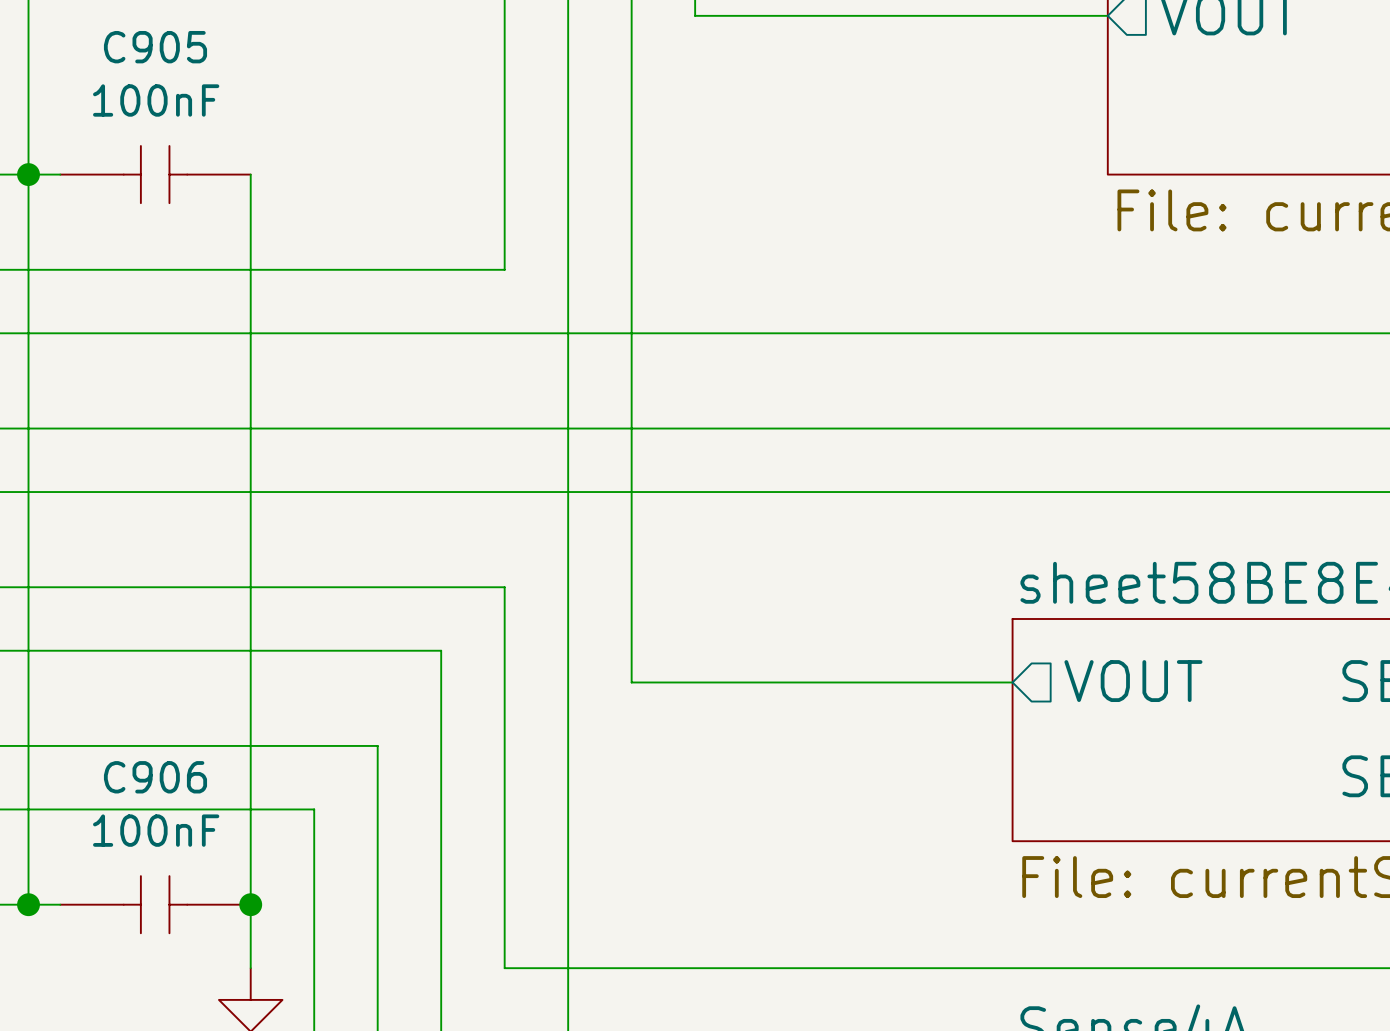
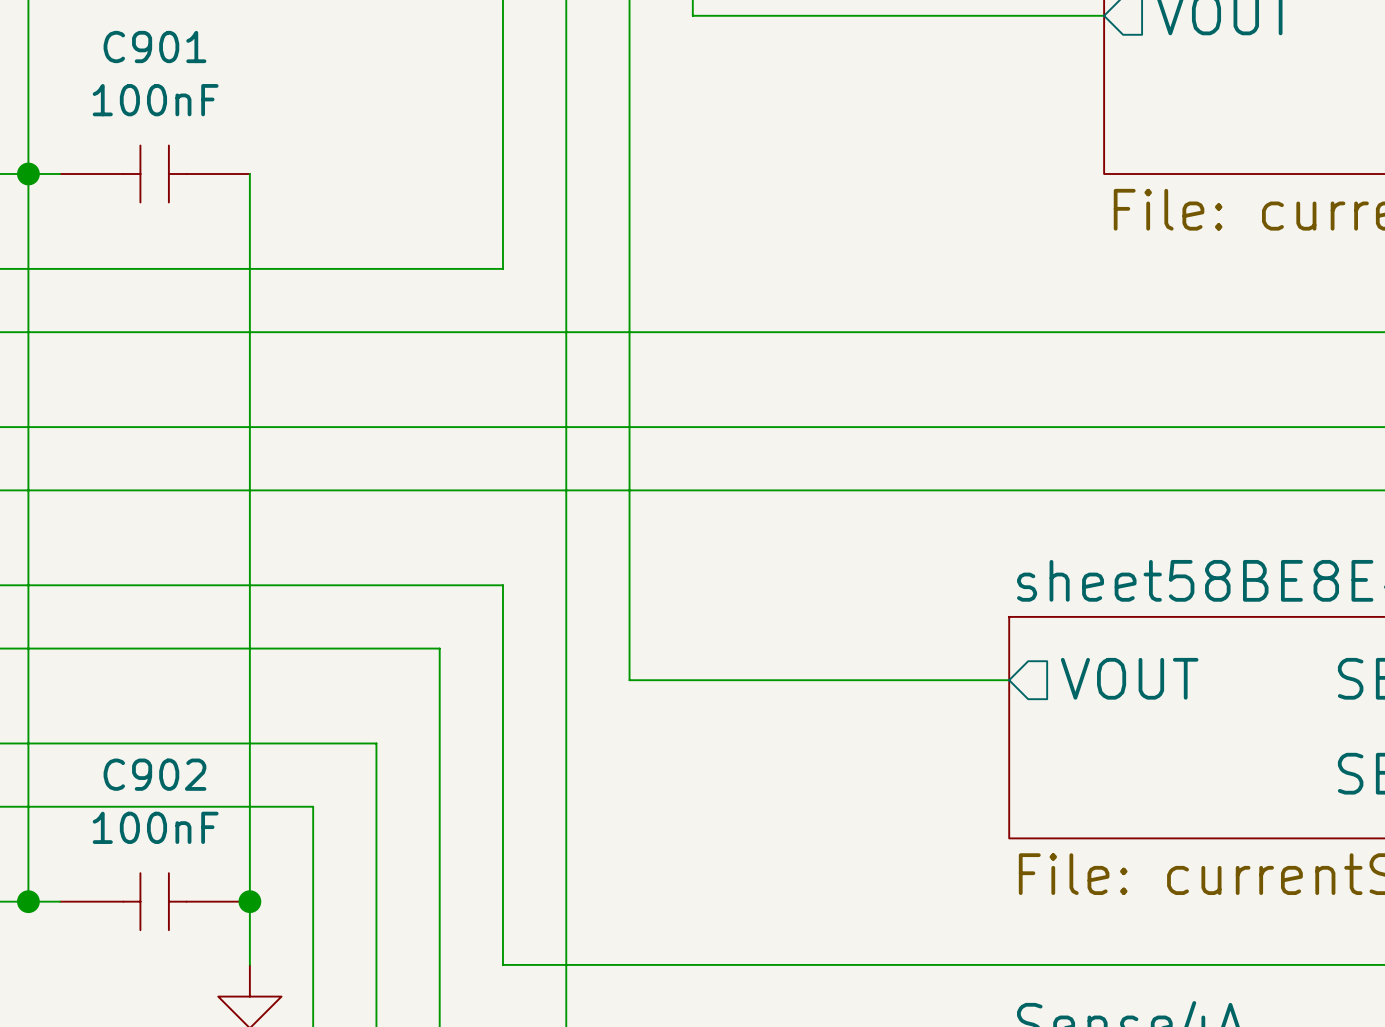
C905 name: C905 (155, 47) -> C901 (154, 47)
C906 name: C906 (155, 777) -> C902 (154, 774)

